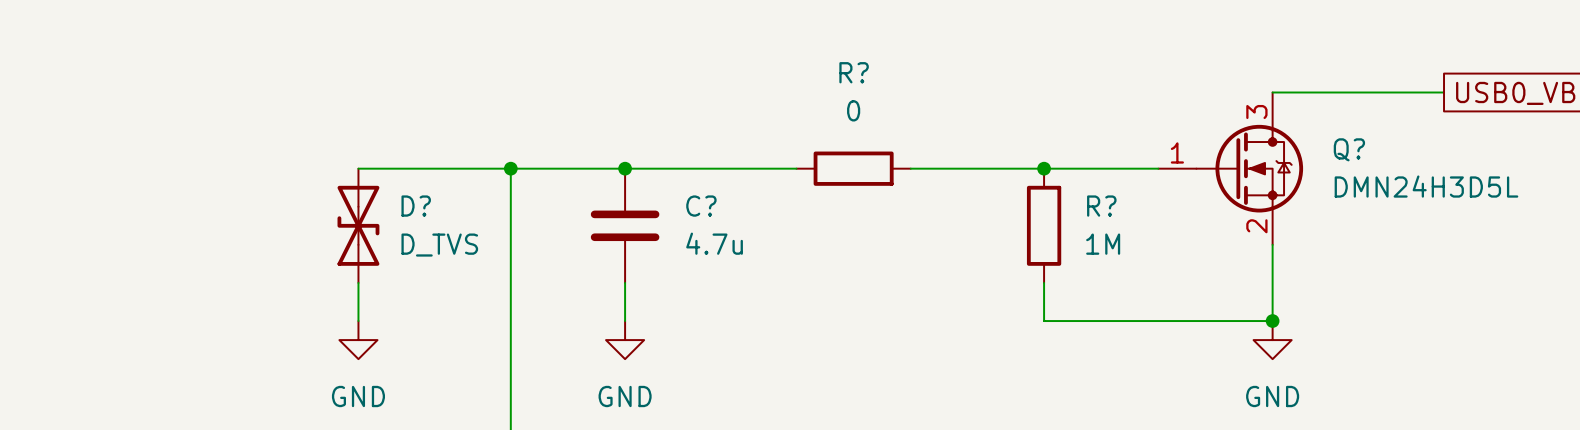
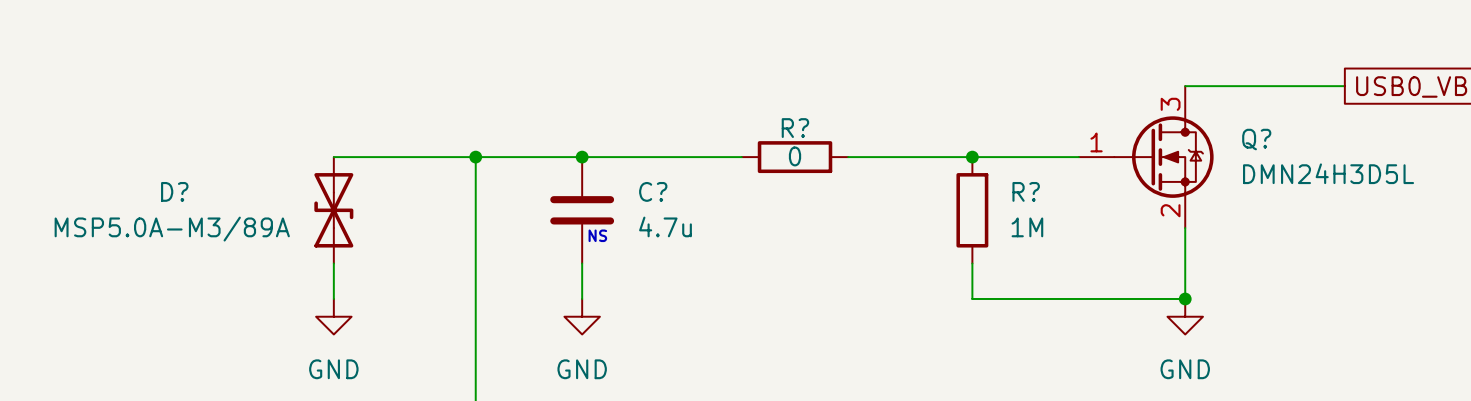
R? name position: R? (854, 72) -> R? (795, 128)
R? value position: 0 (853, 110) -> 0 (795, 156)
D? name position: D? (416, 206) -> D? (174, 191)
D? value: D_TVS (439, 245) -> MSP5.0A-M3/89A (172, 229)
text: none -> NS (597, 235)

